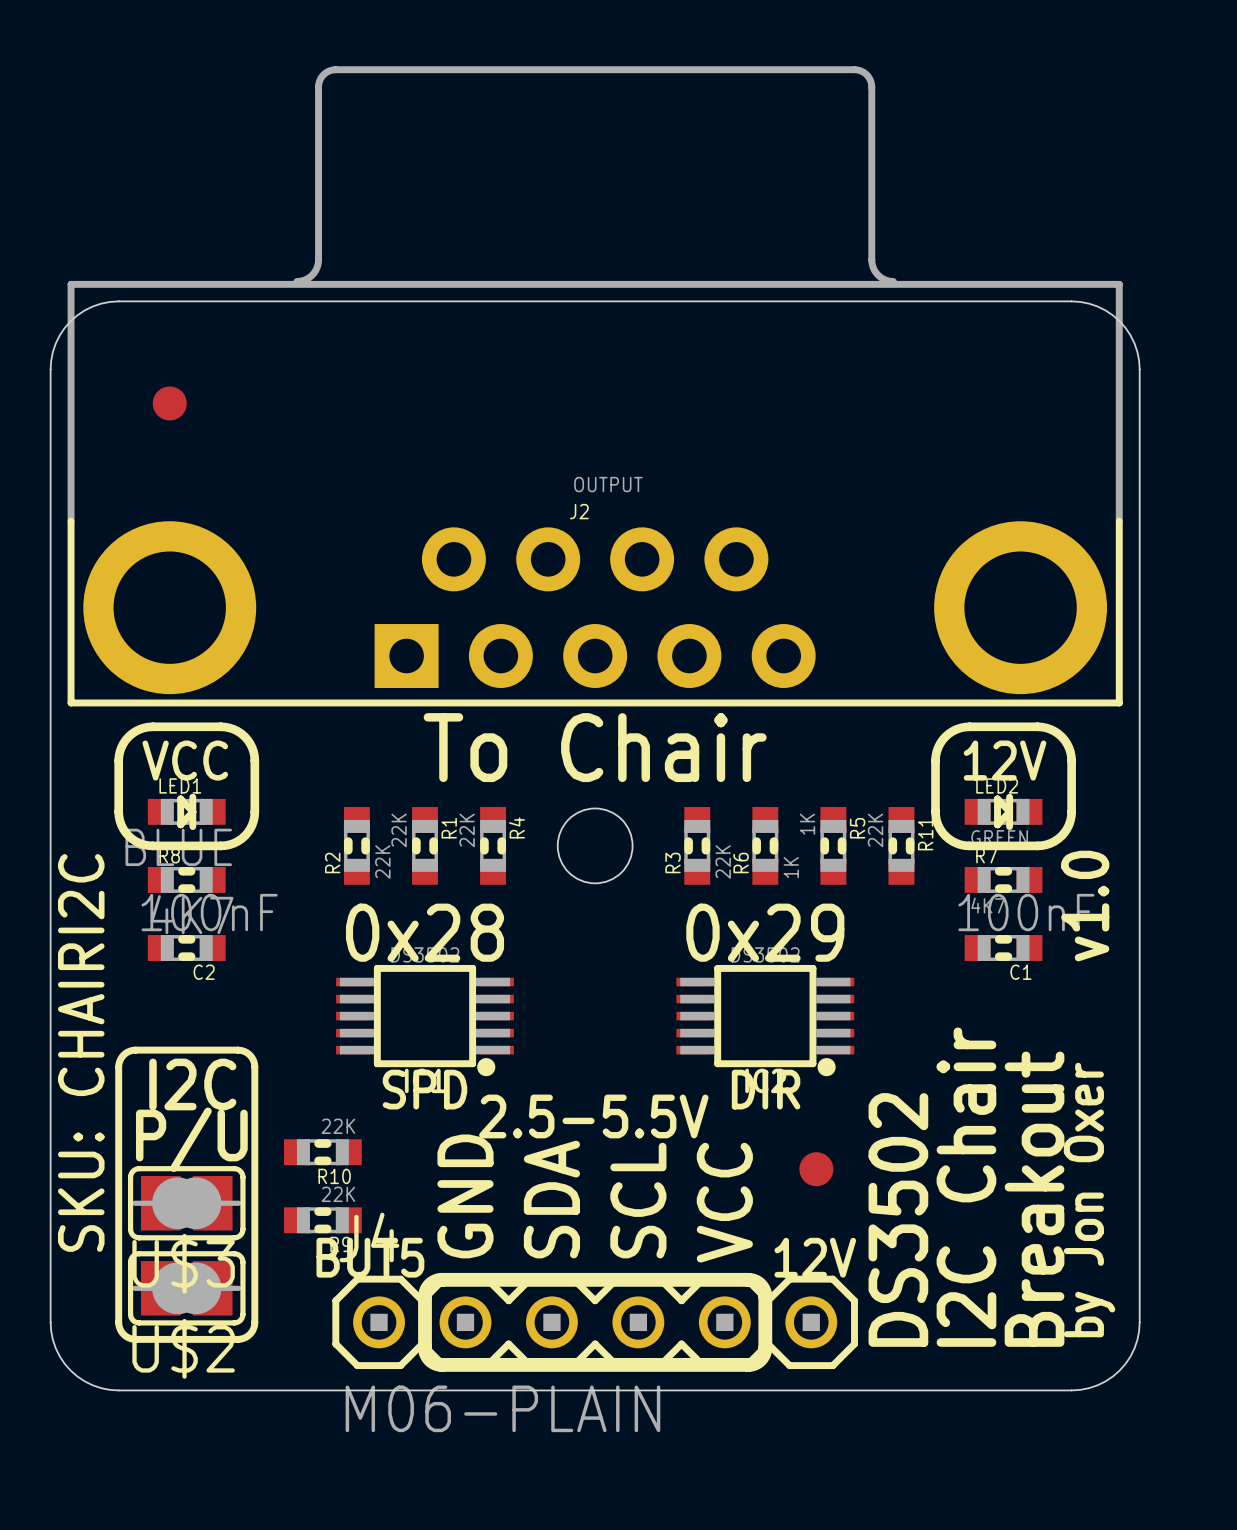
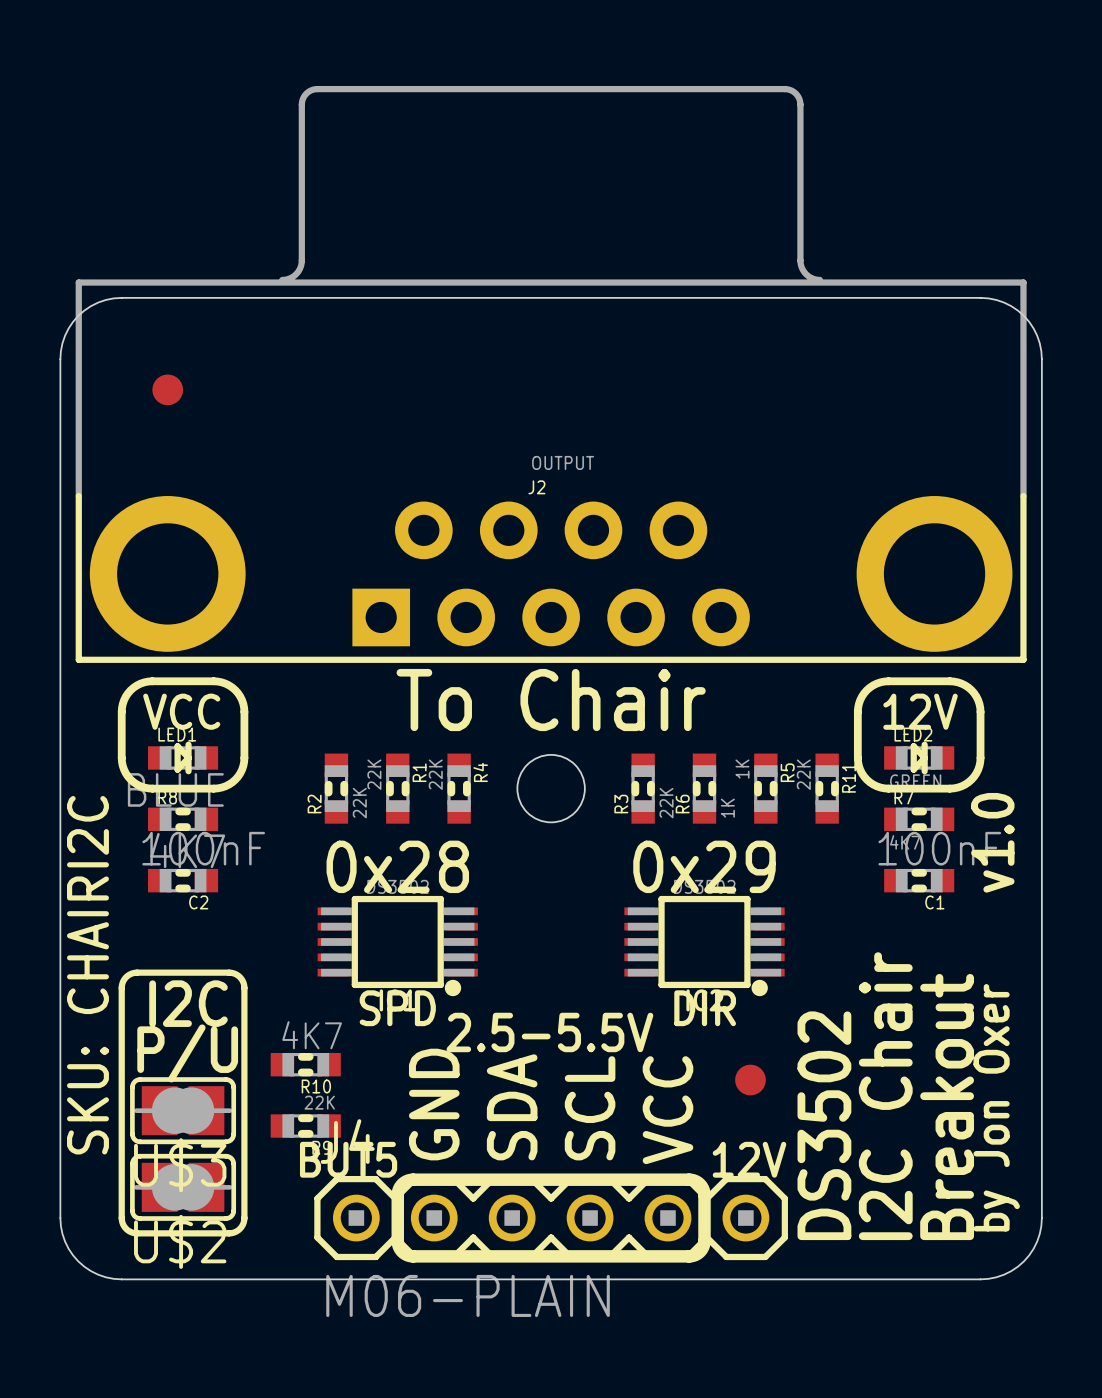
R10 value: 22K (338, 1126) -> 4K7 (312, 1035)

